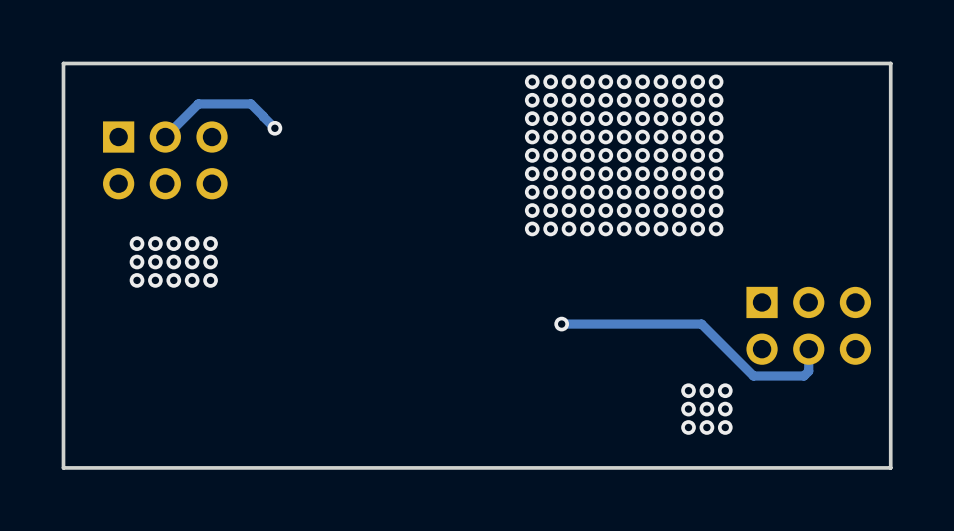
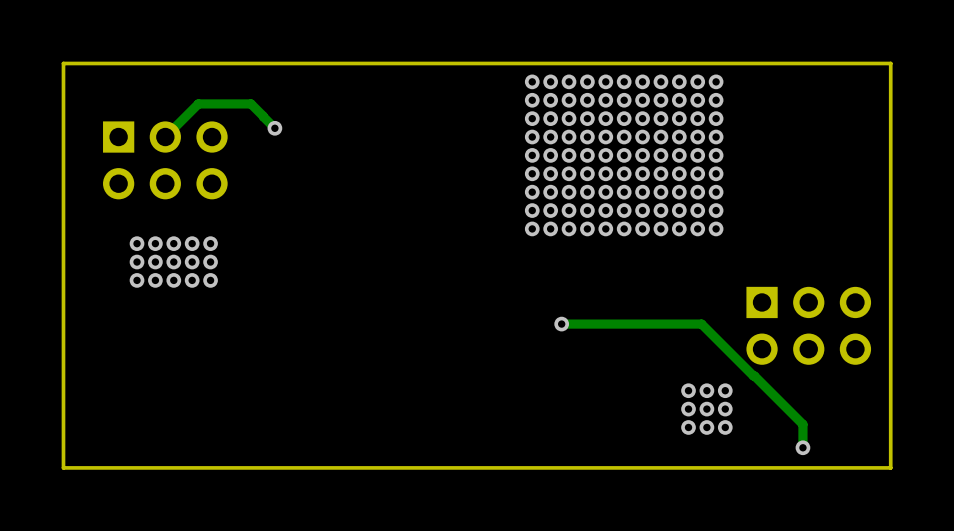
track: (808, 349) (808, 371) (804, 376) (754, 376) -> (802, 447) (802, 424) (754, 376)
via: none -> (802, 447)

